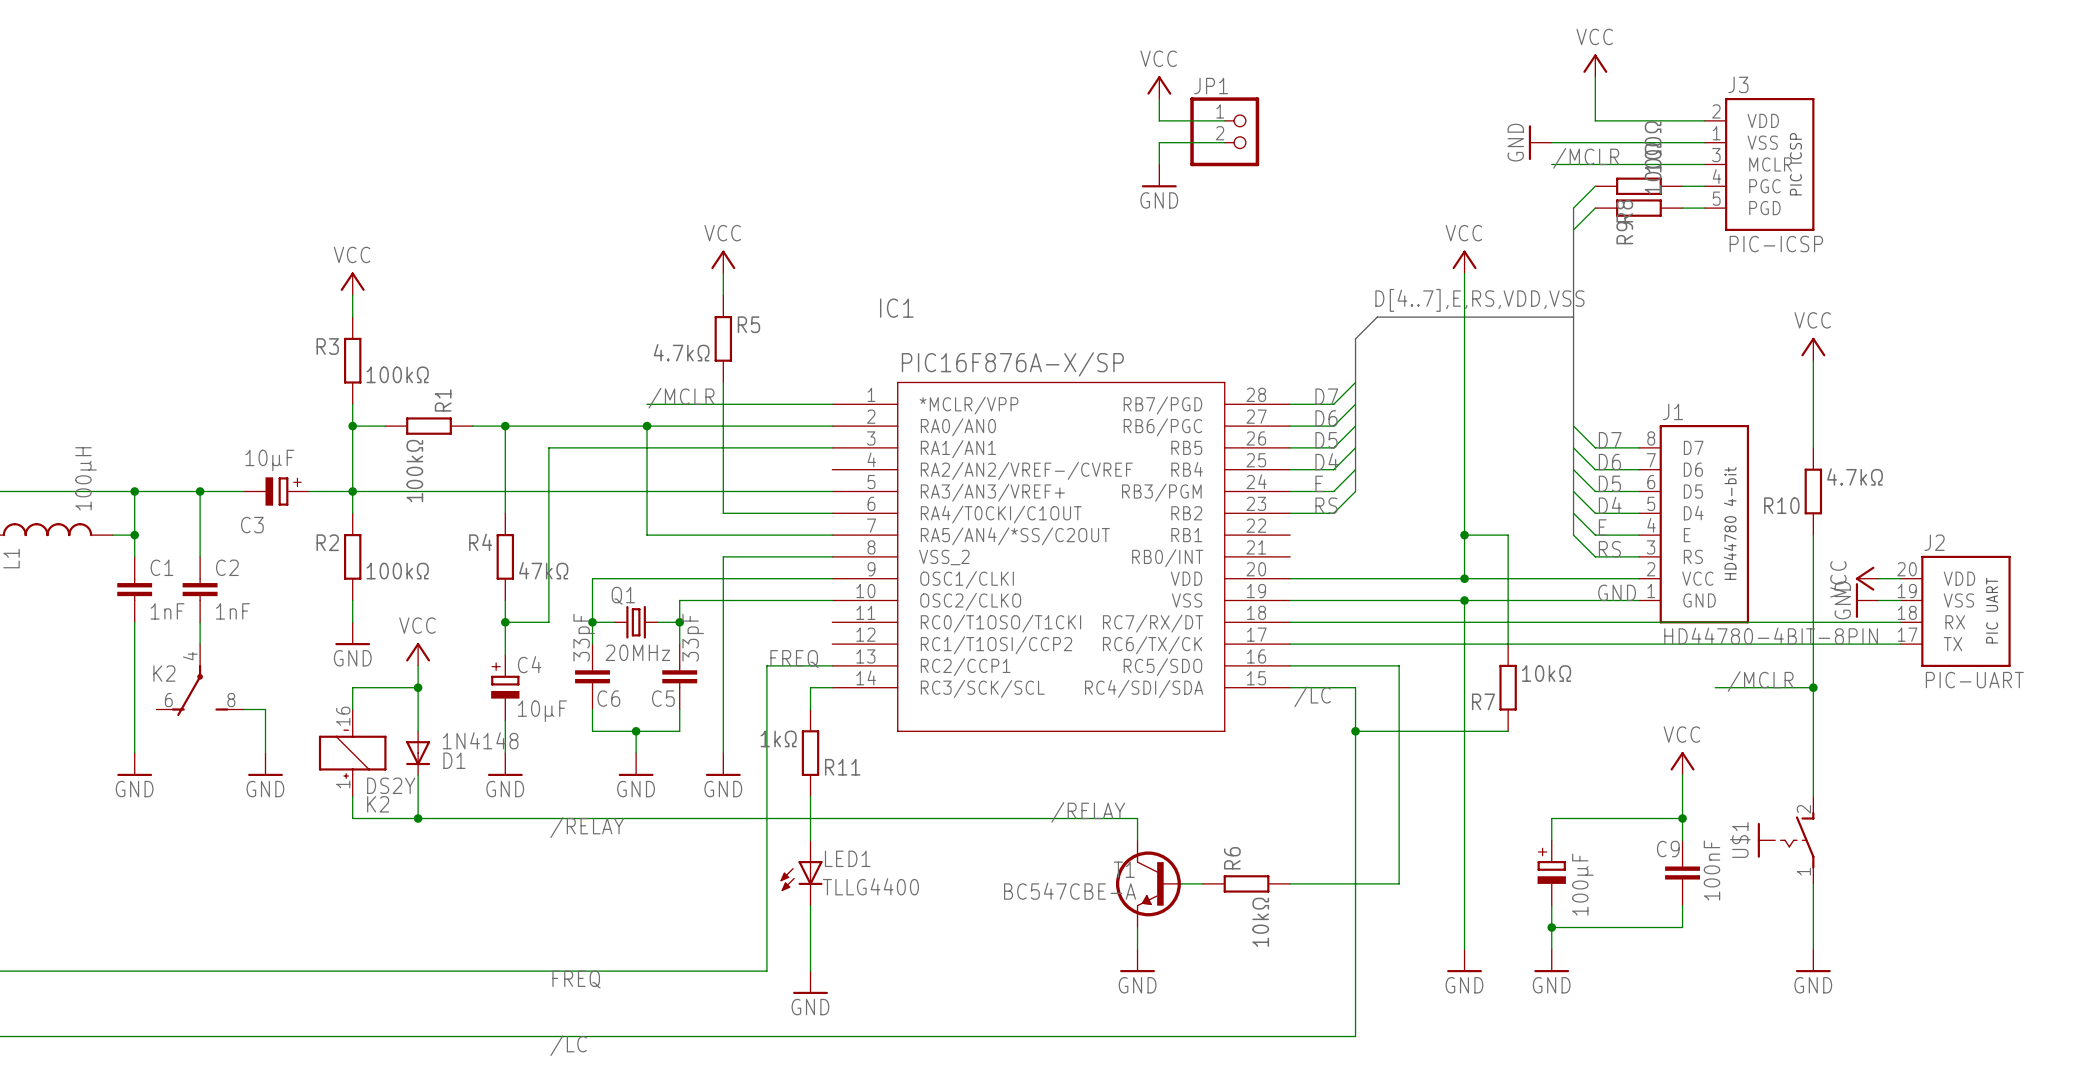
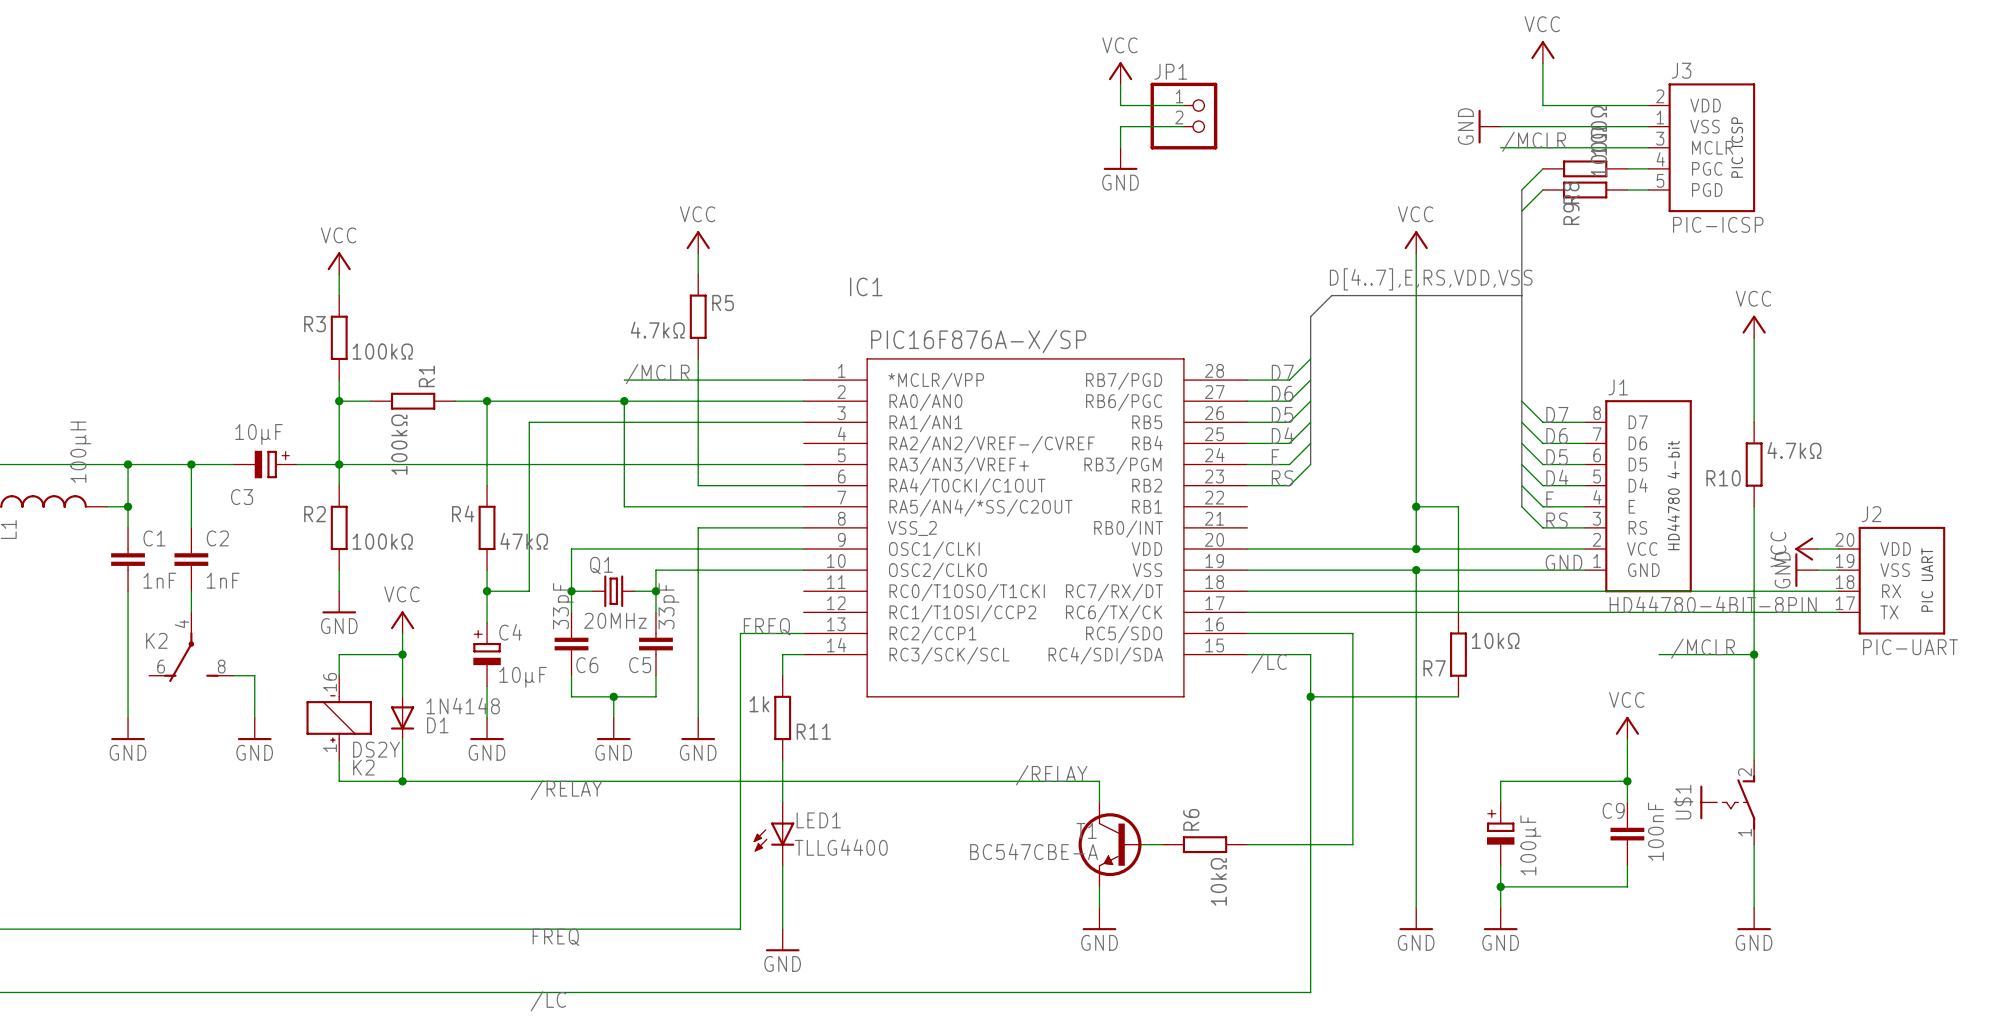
R11 value: 1kΩ (778, 738) -> 1k (759, 704)

